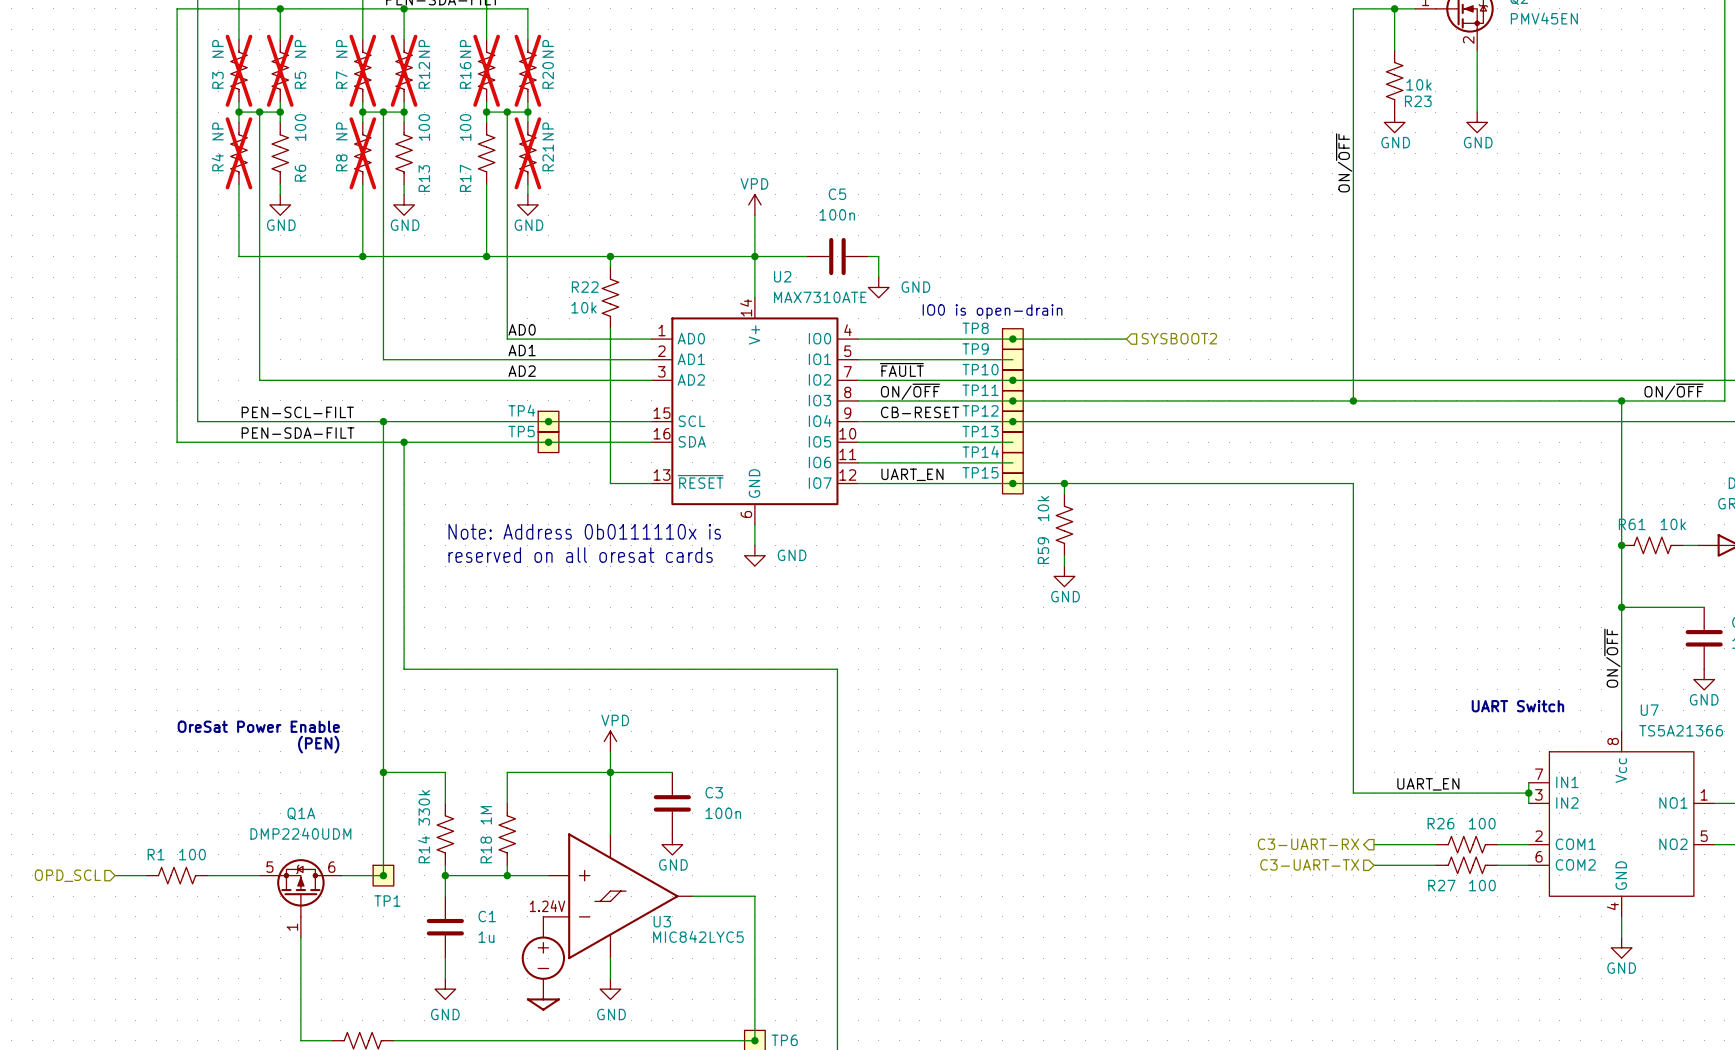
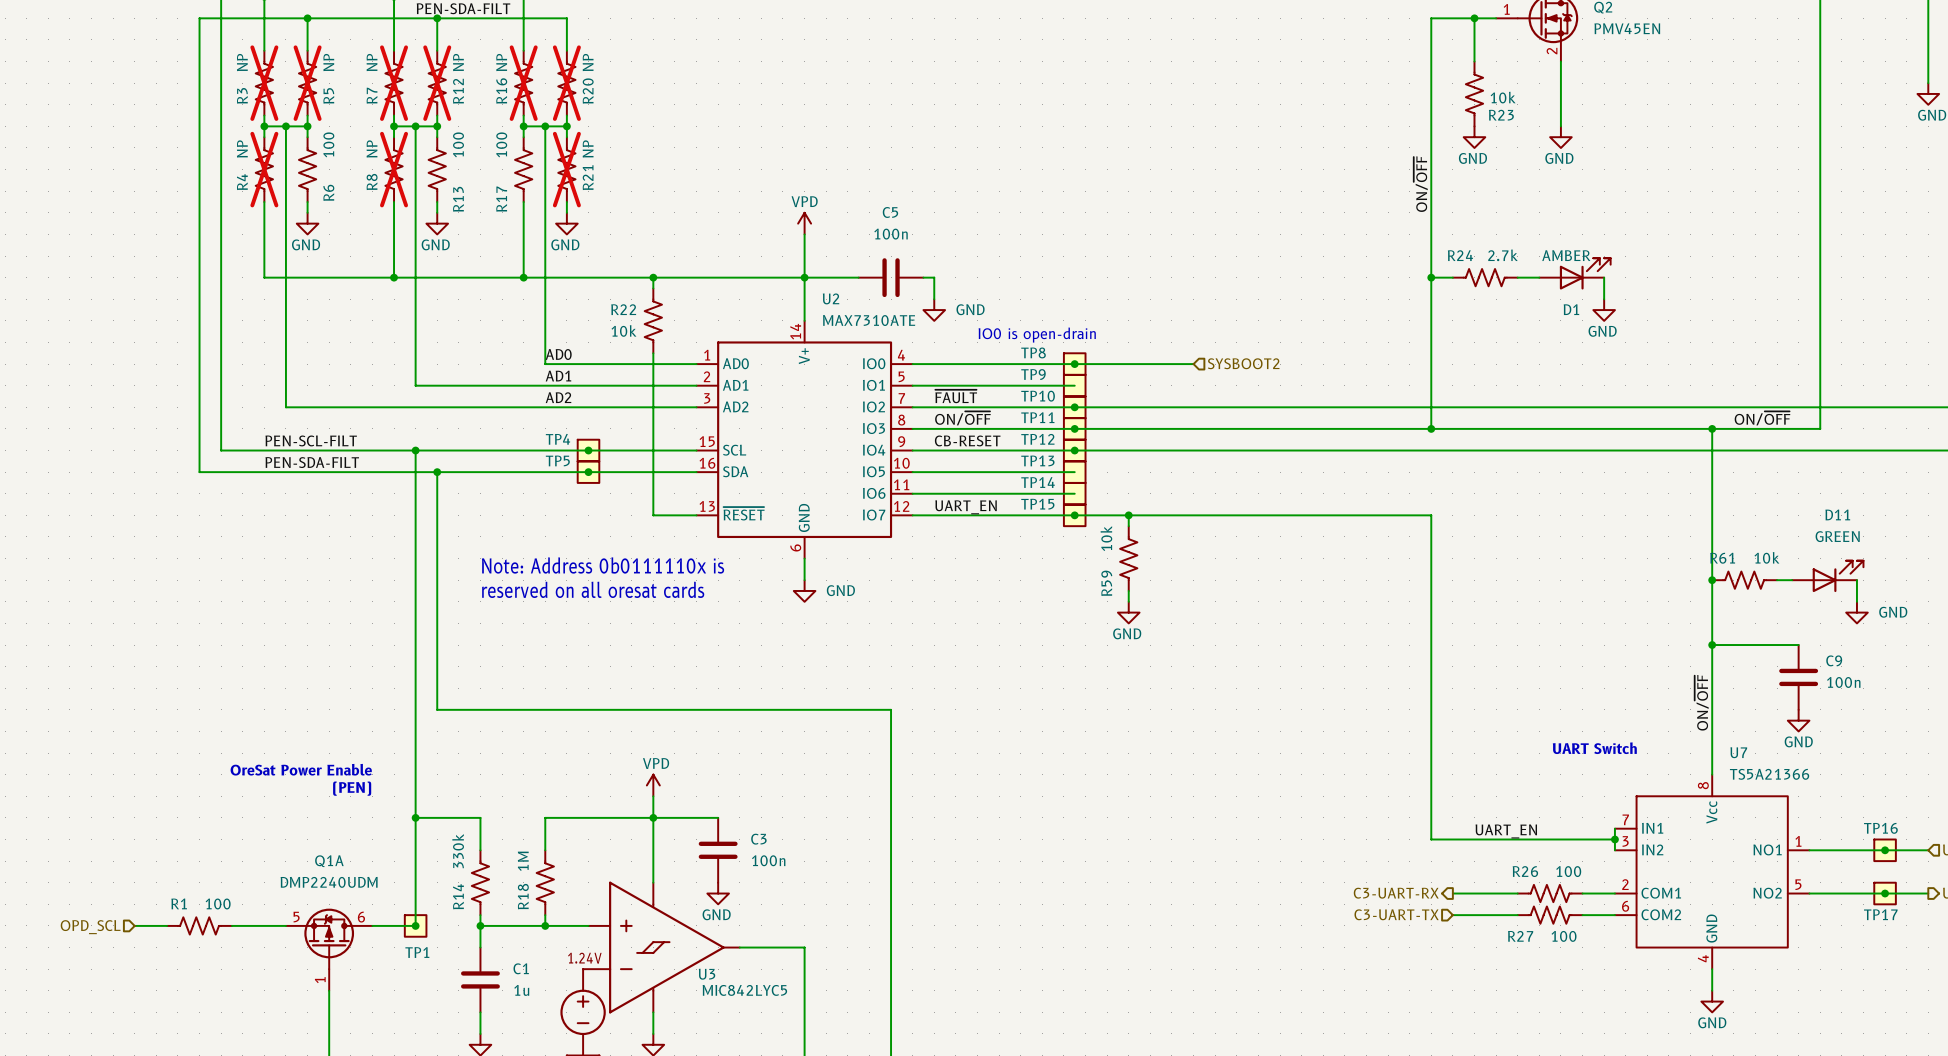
D1: none -> AMBER (1574, 273)
wire: none -> (1431, 277) (1452, 277)
junction: none -> (1431, 277)
R24: none -> 2.7k (1485, 277)
wire: none -> (1517, 277) (1539, 277)
wire: none -> (1604, 277) (1604, 299)
power symbol: none -> GND (1604, 310)

